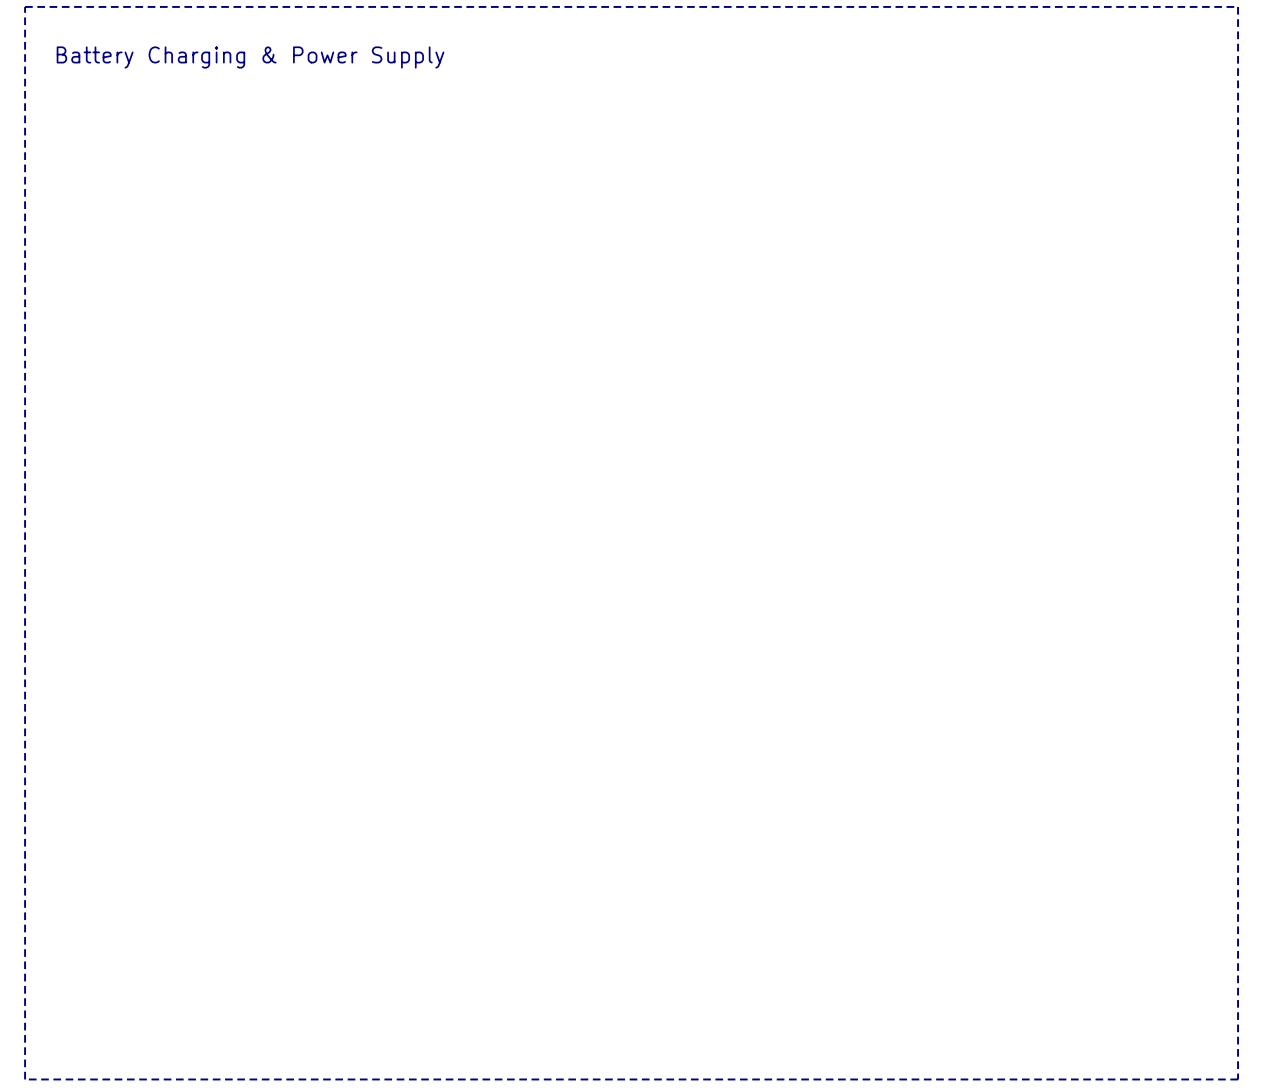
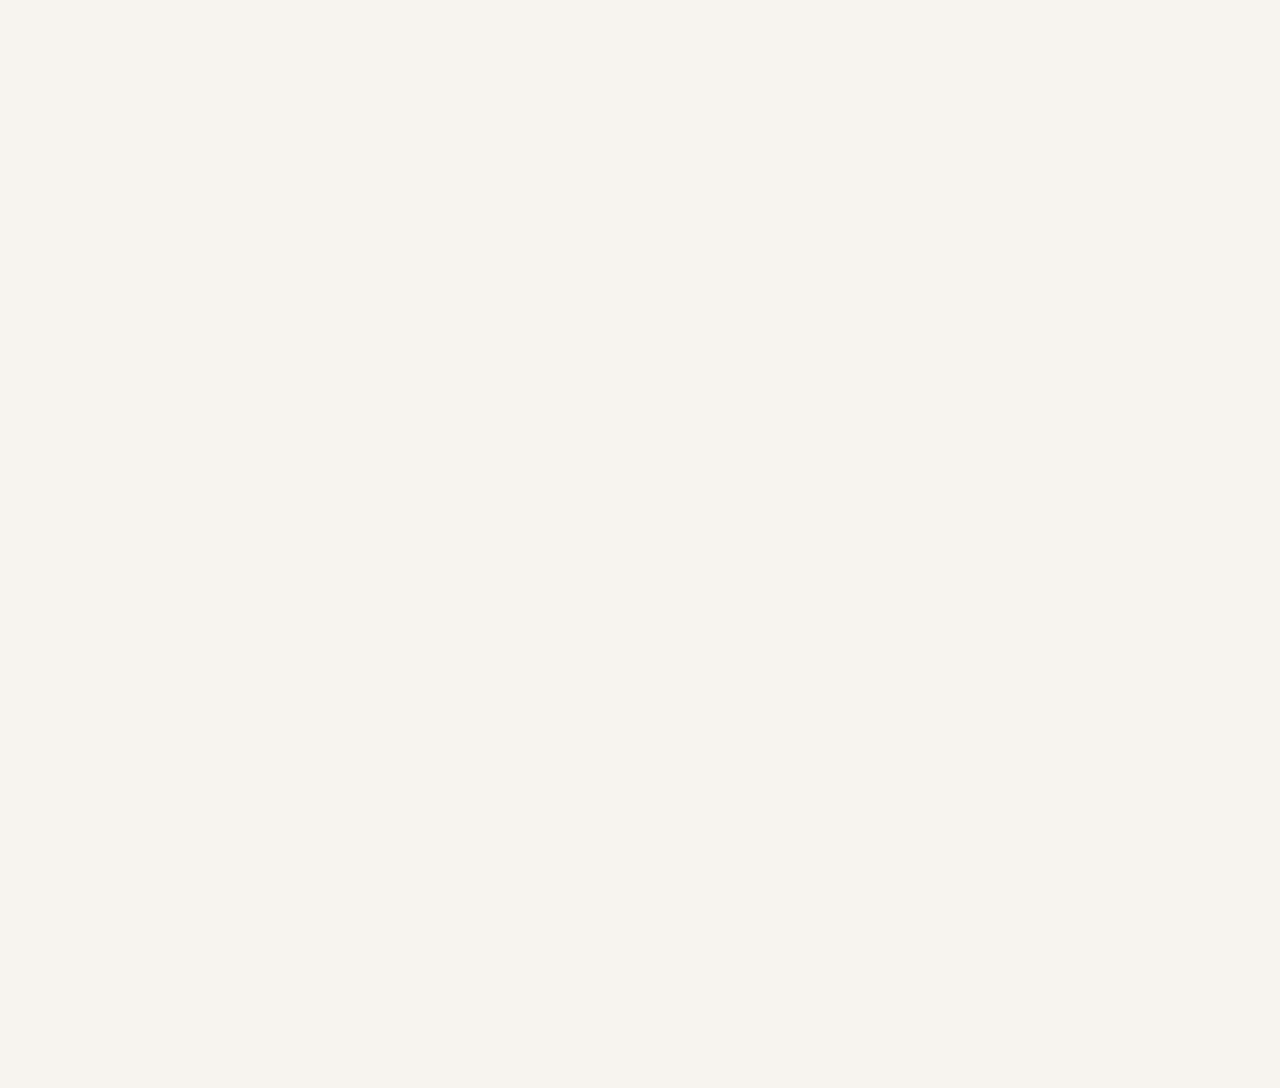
line: (25, 6) (1238, 6) (1238, 1079) (25, 1079) (25, 6) -> none
text: Battery Charging & Power Supply (250, 57) -> none

